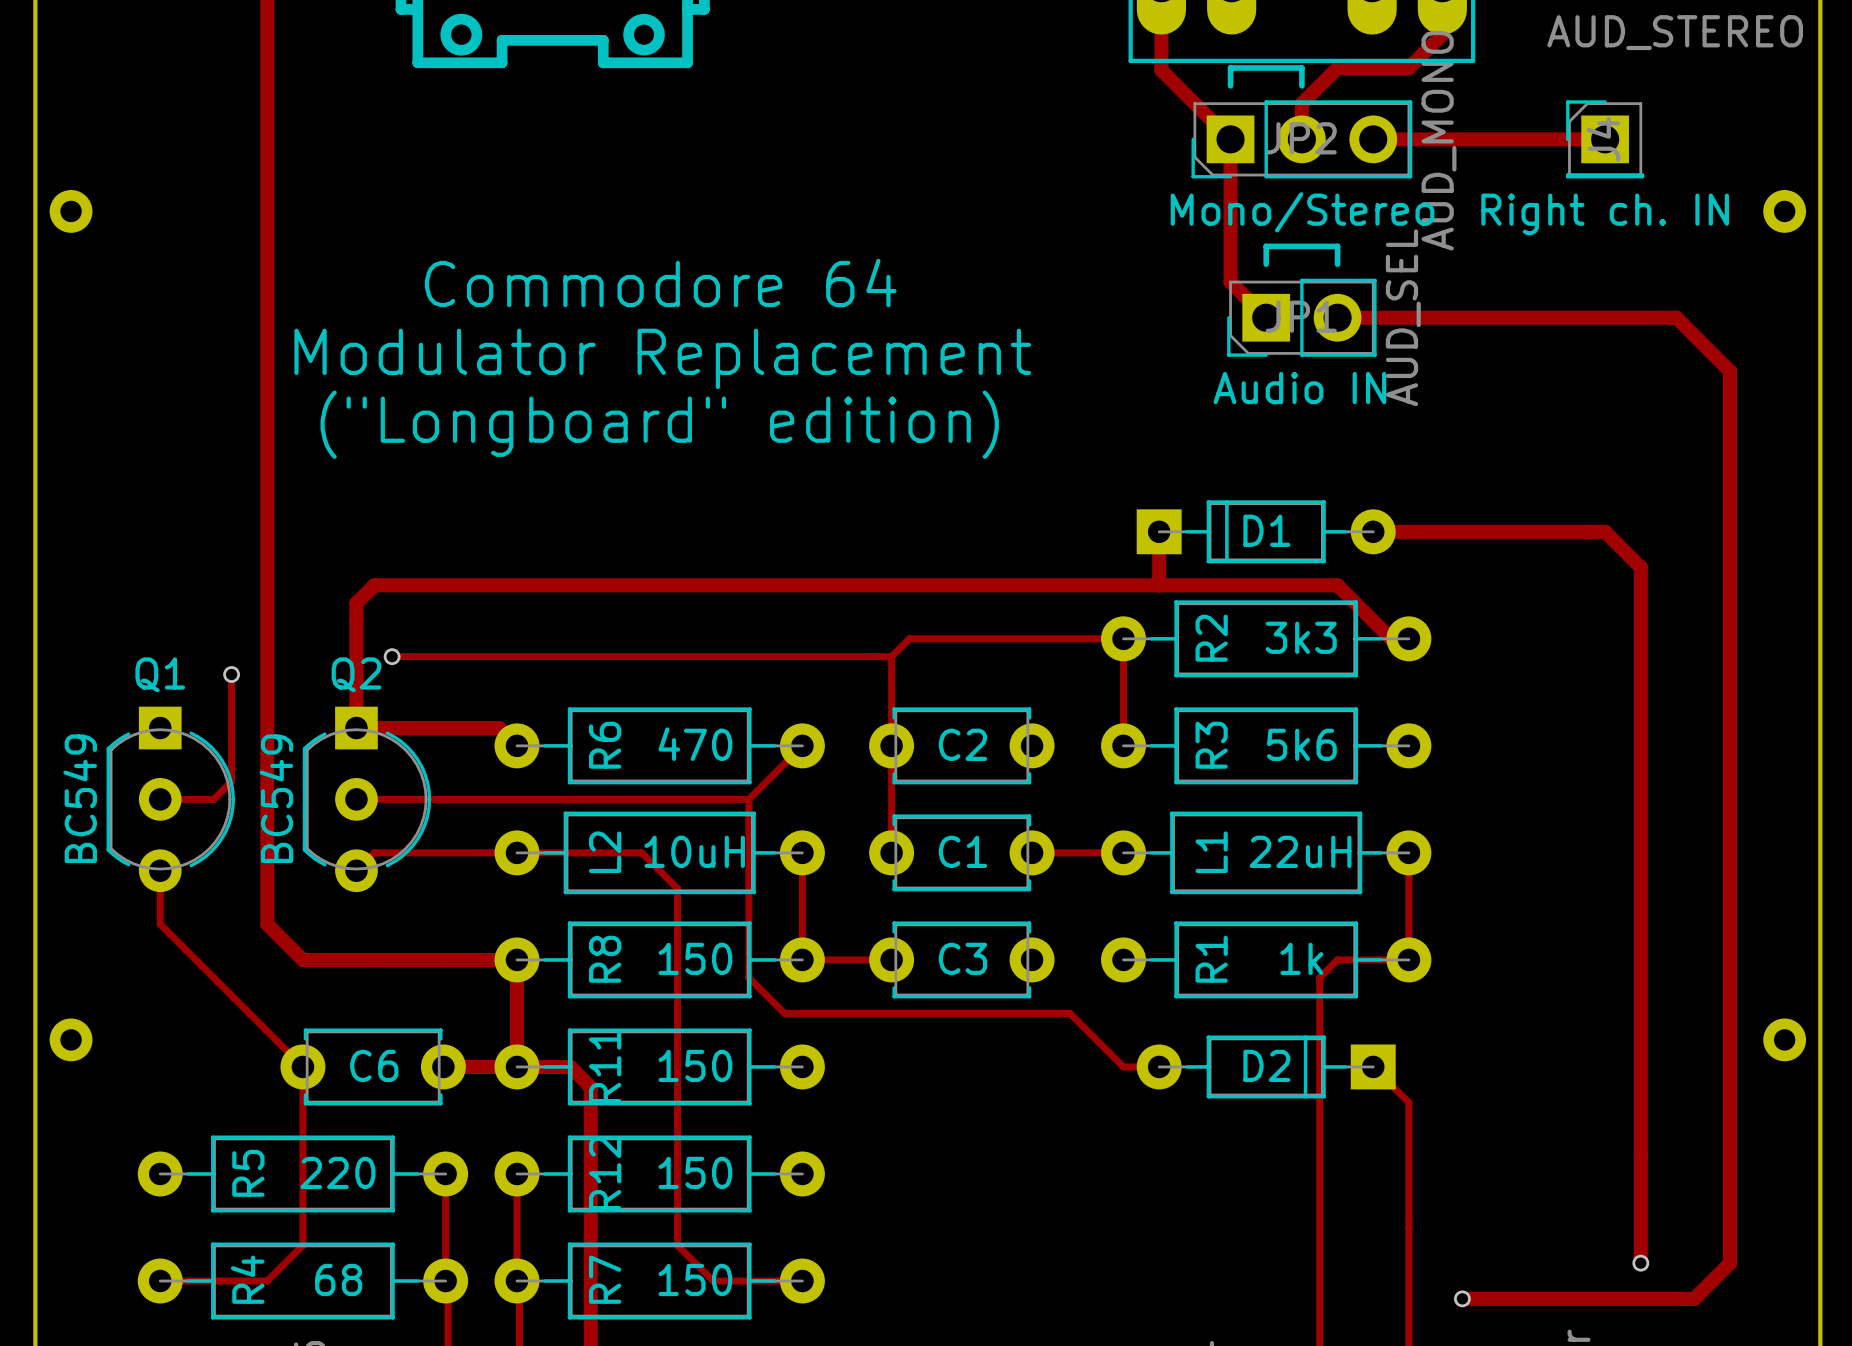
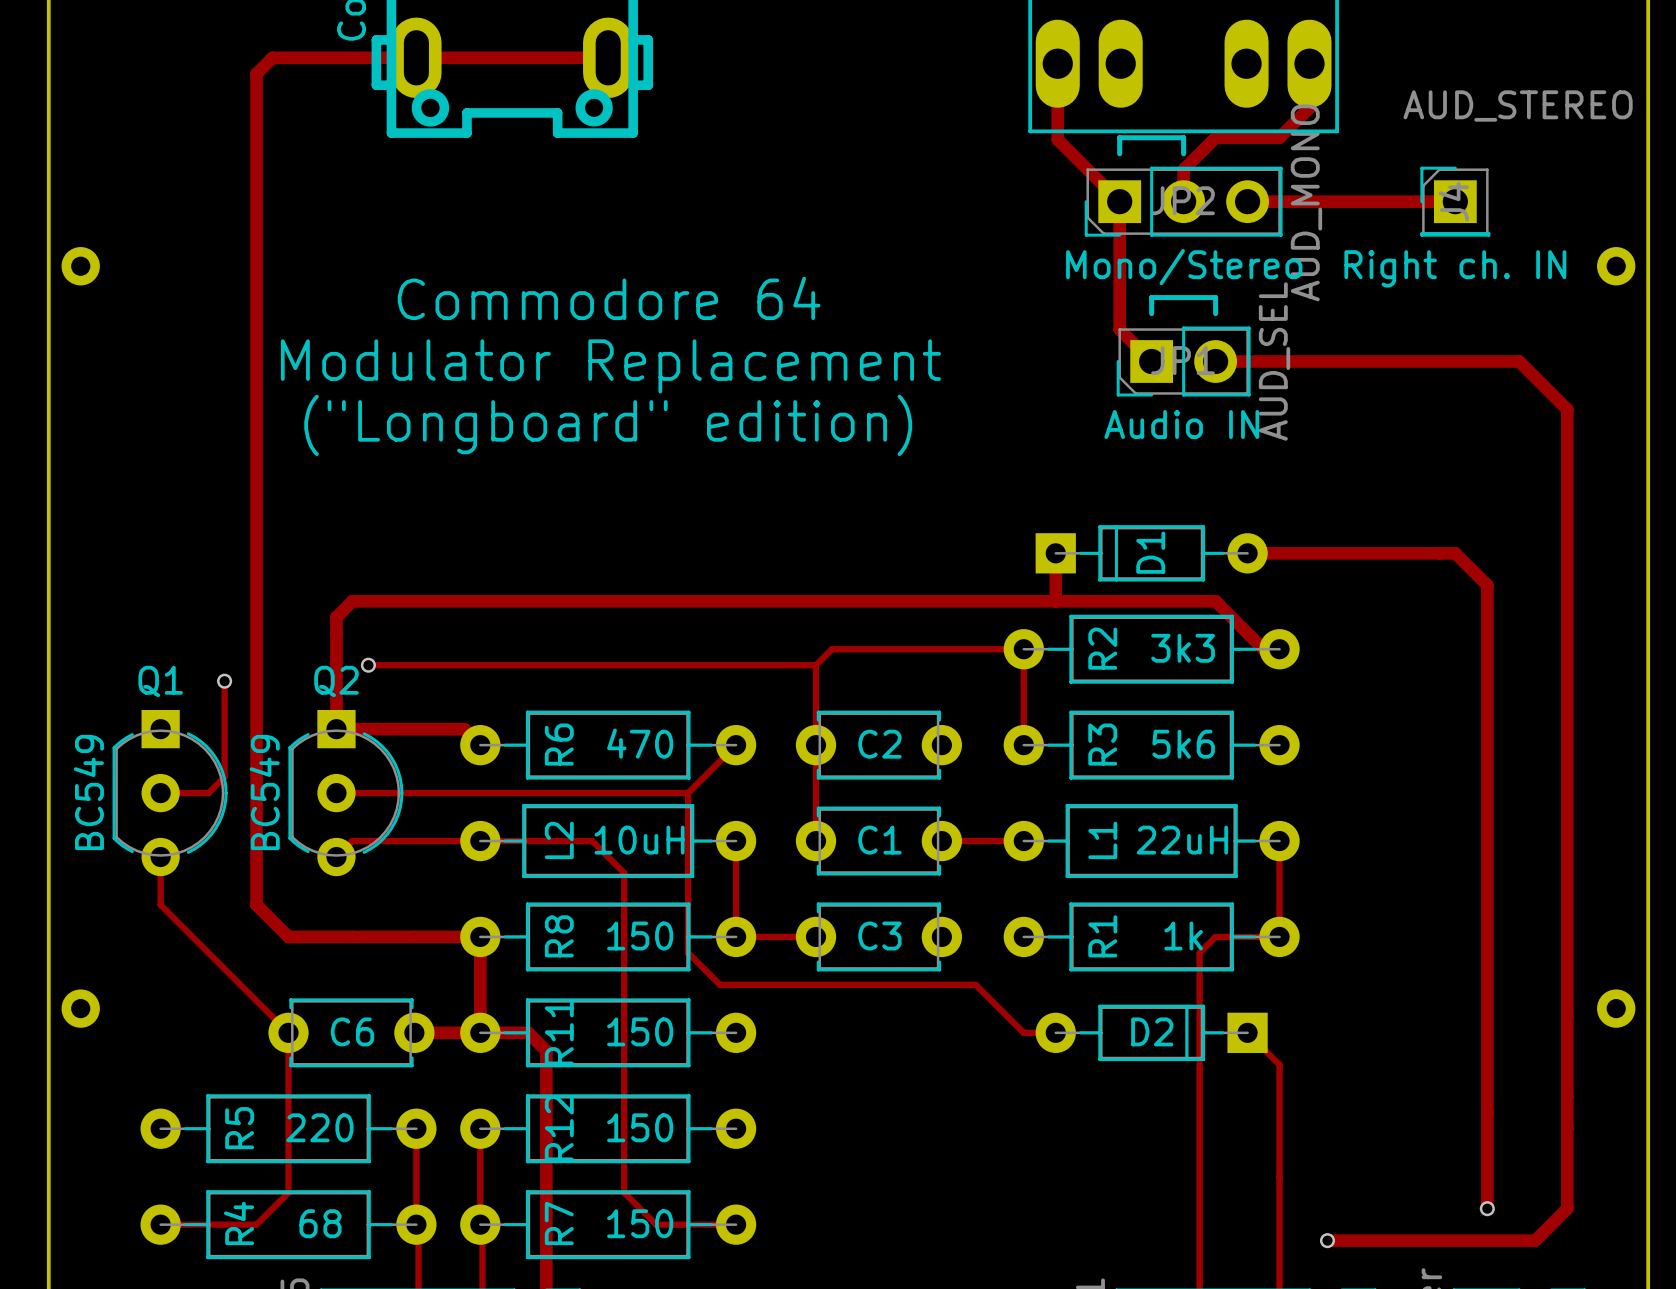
text position: Commodore 64 (660, 283) -> Commodore 64 (609, 298)
text position: Modulator Replacement (662, 358) -> Modulator Replacement (610, 366)
text position: ("Longboard" edition) (659, 424) -> ("Longboard" edition) (608, 425)
D1 name rotation: 0° (1266, 530) -> 90° counterclockwise (1150, 552)

